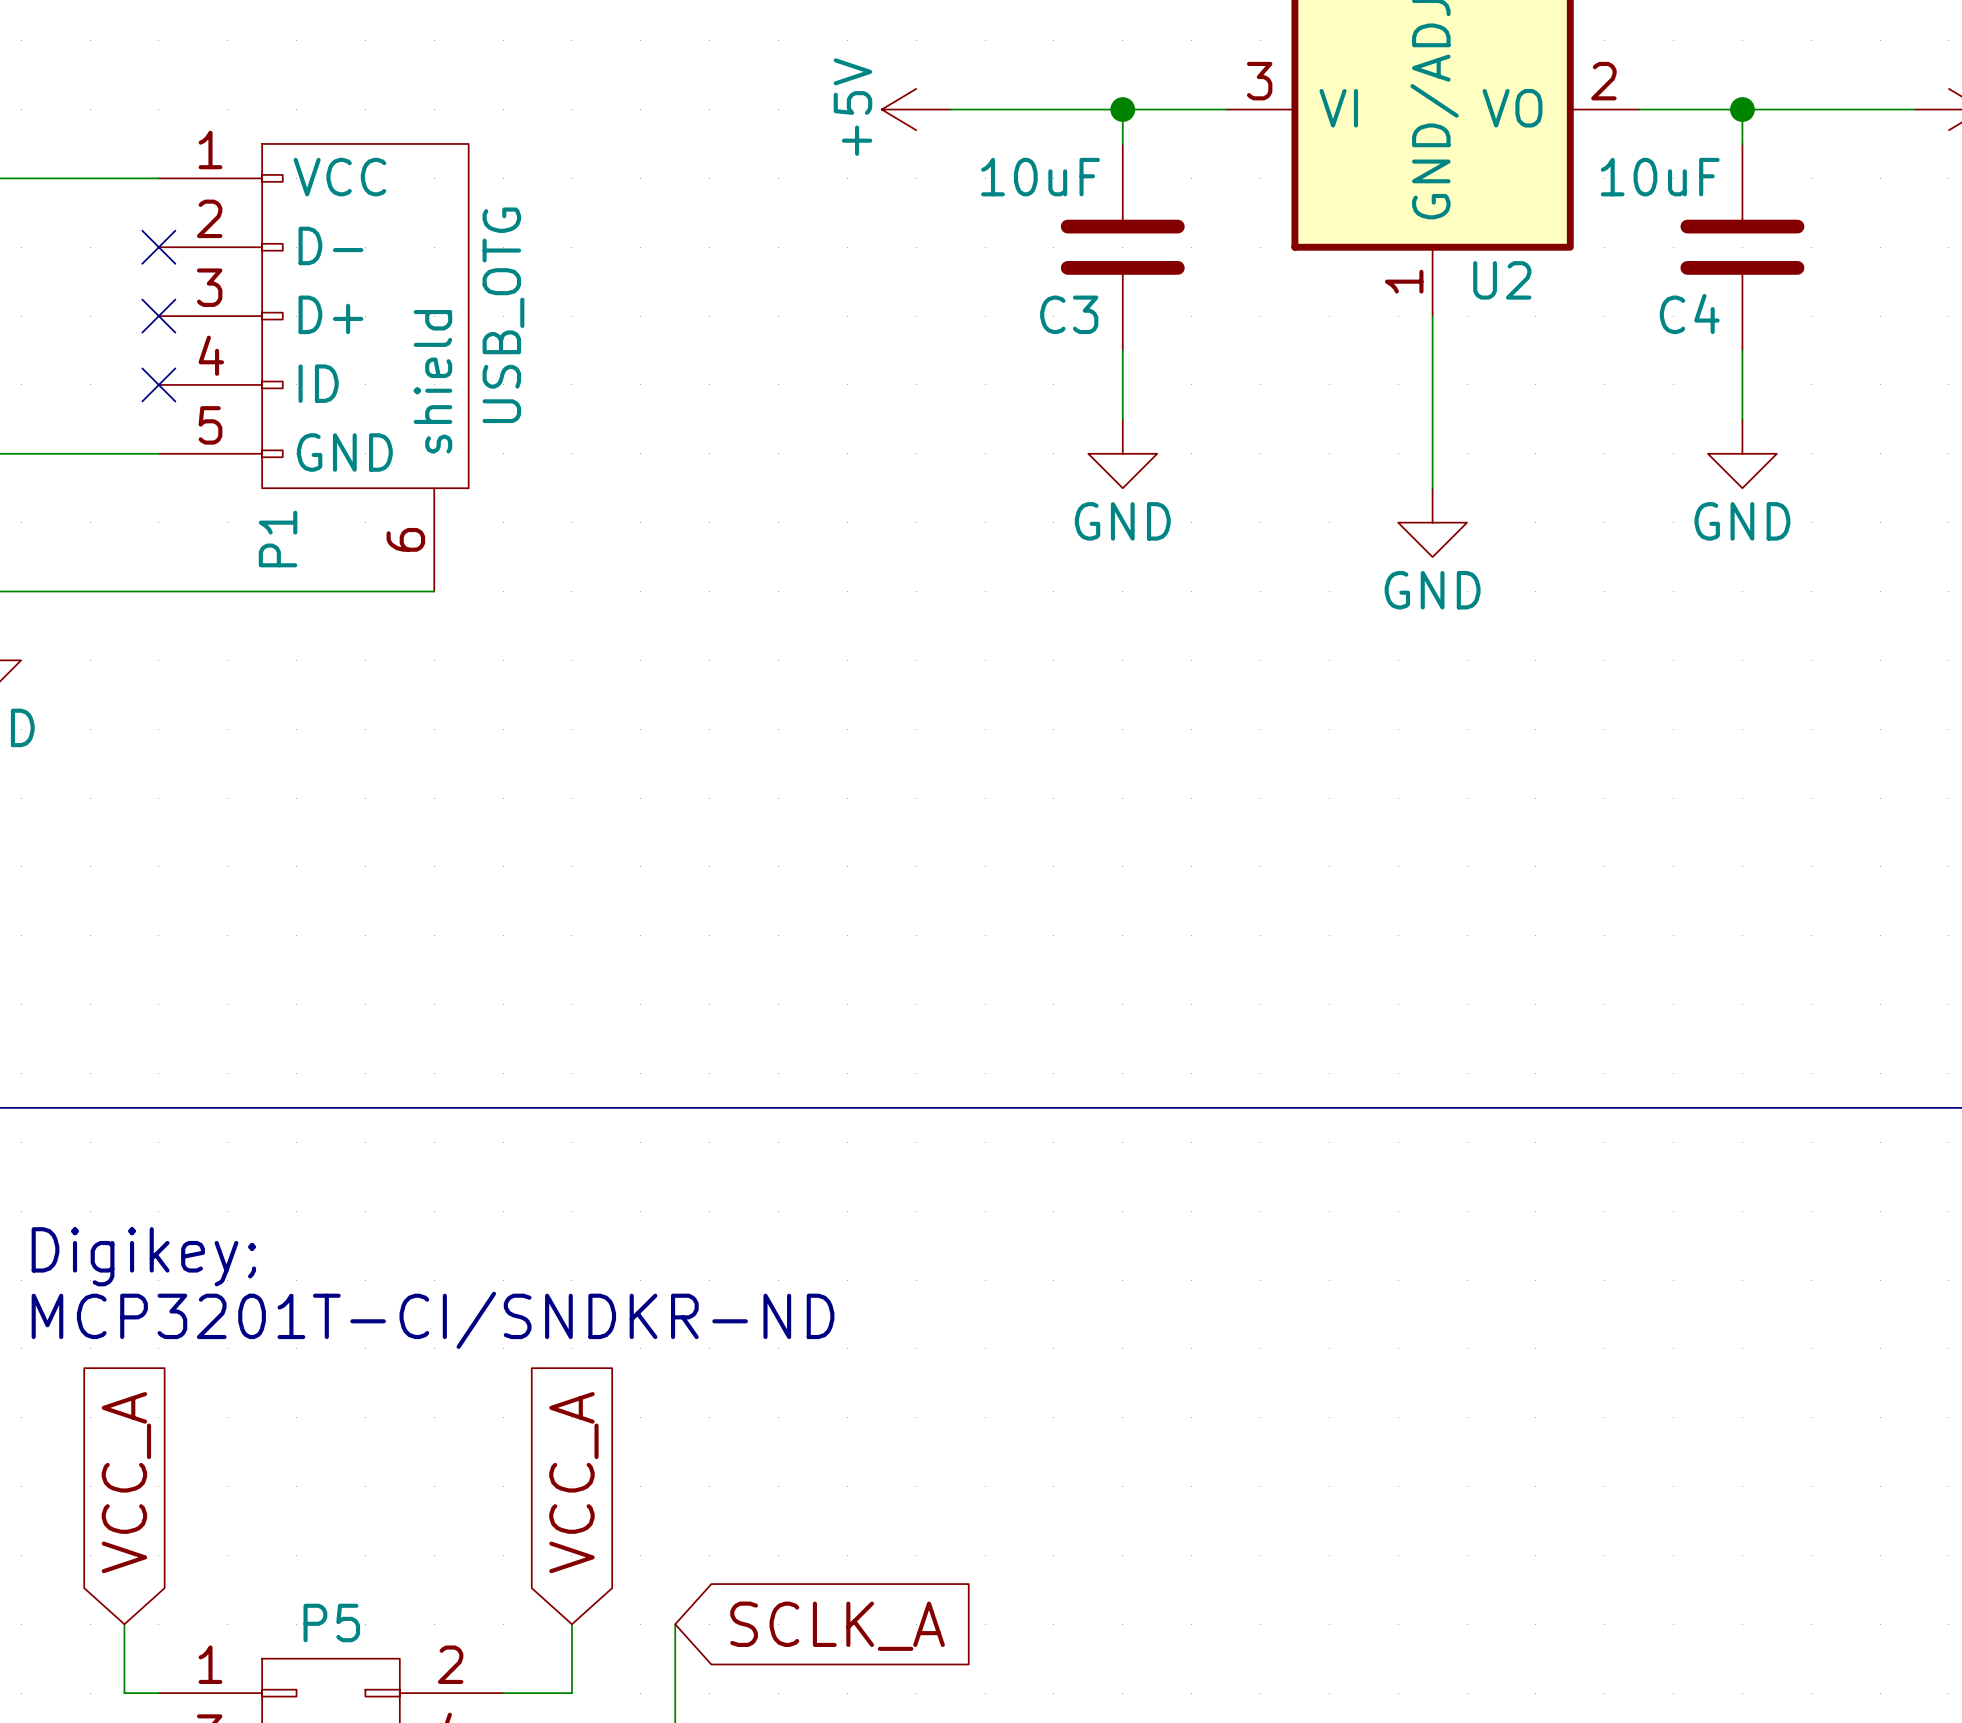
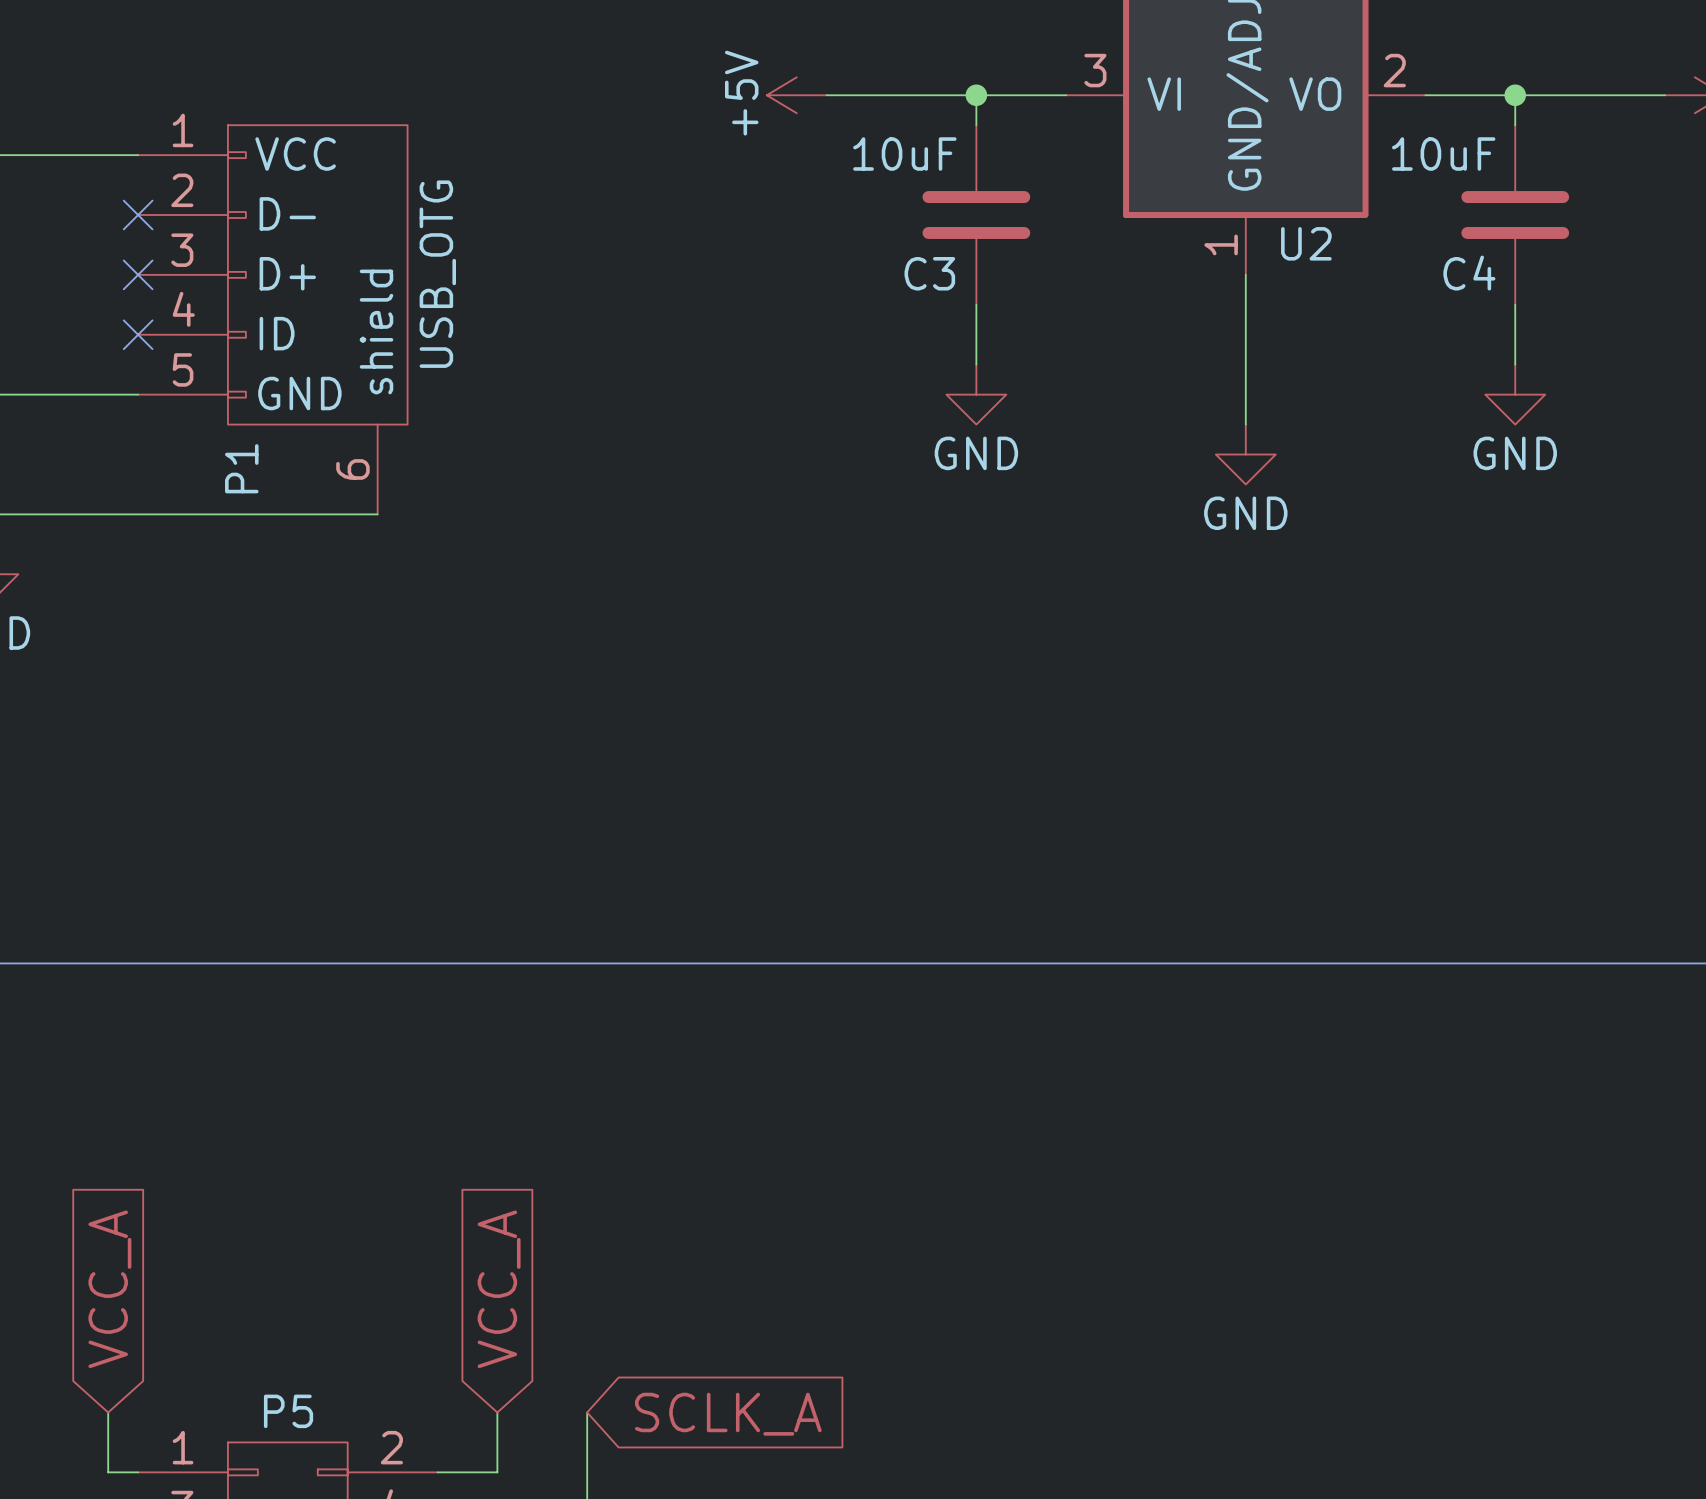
text: Digikey; (143, 1256) -> none
text: MCP3201T-CI/SNDKR-ND (433, 1320) -> none

